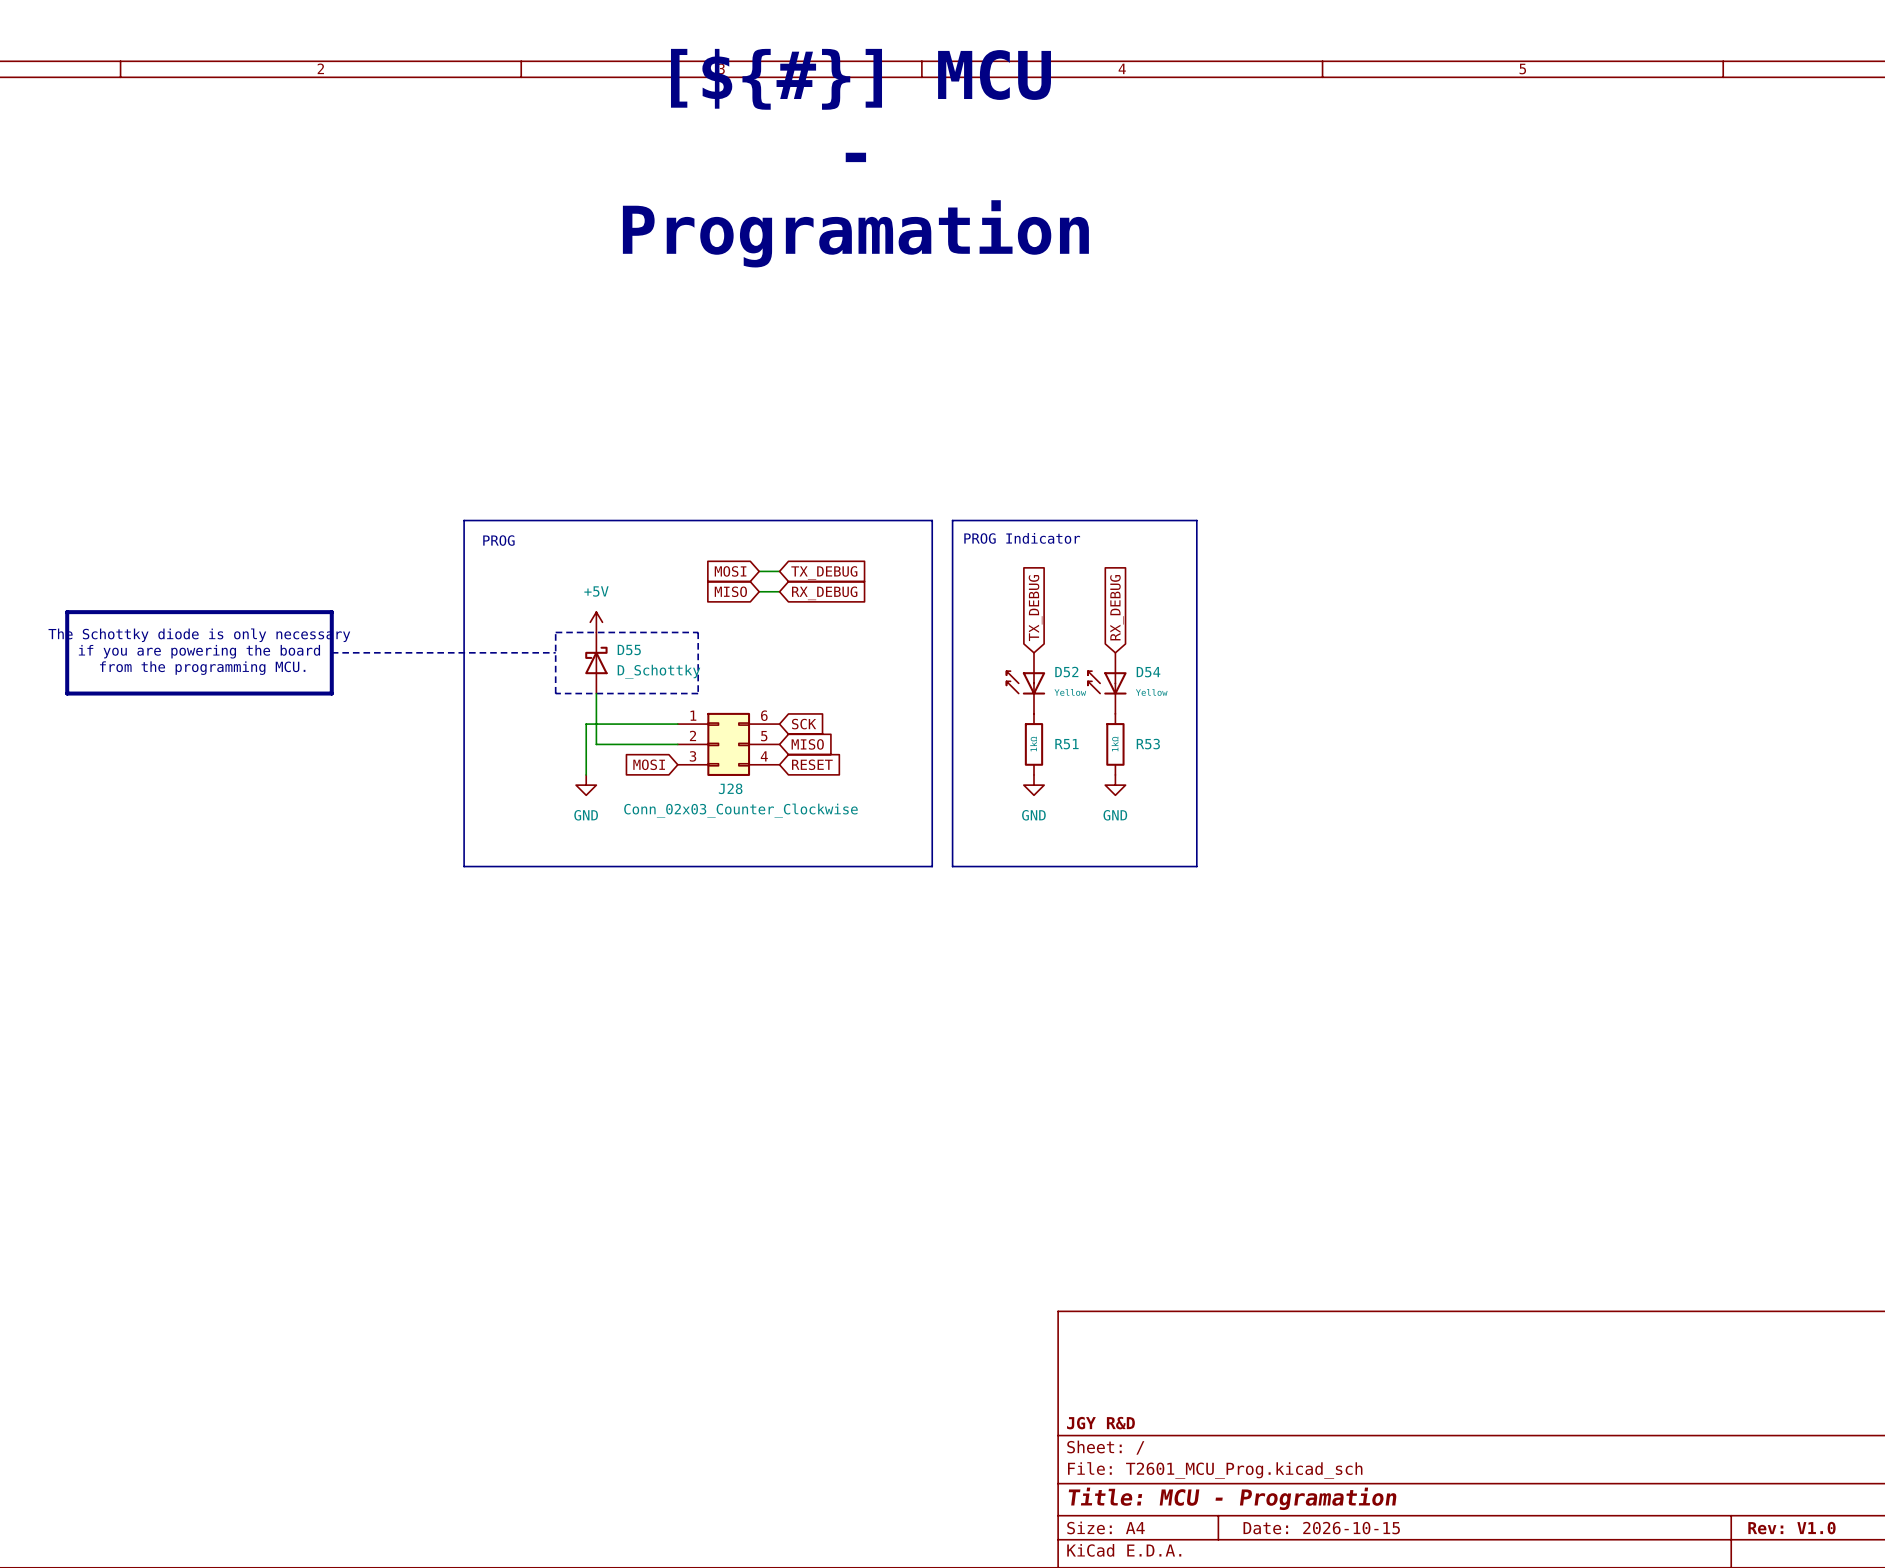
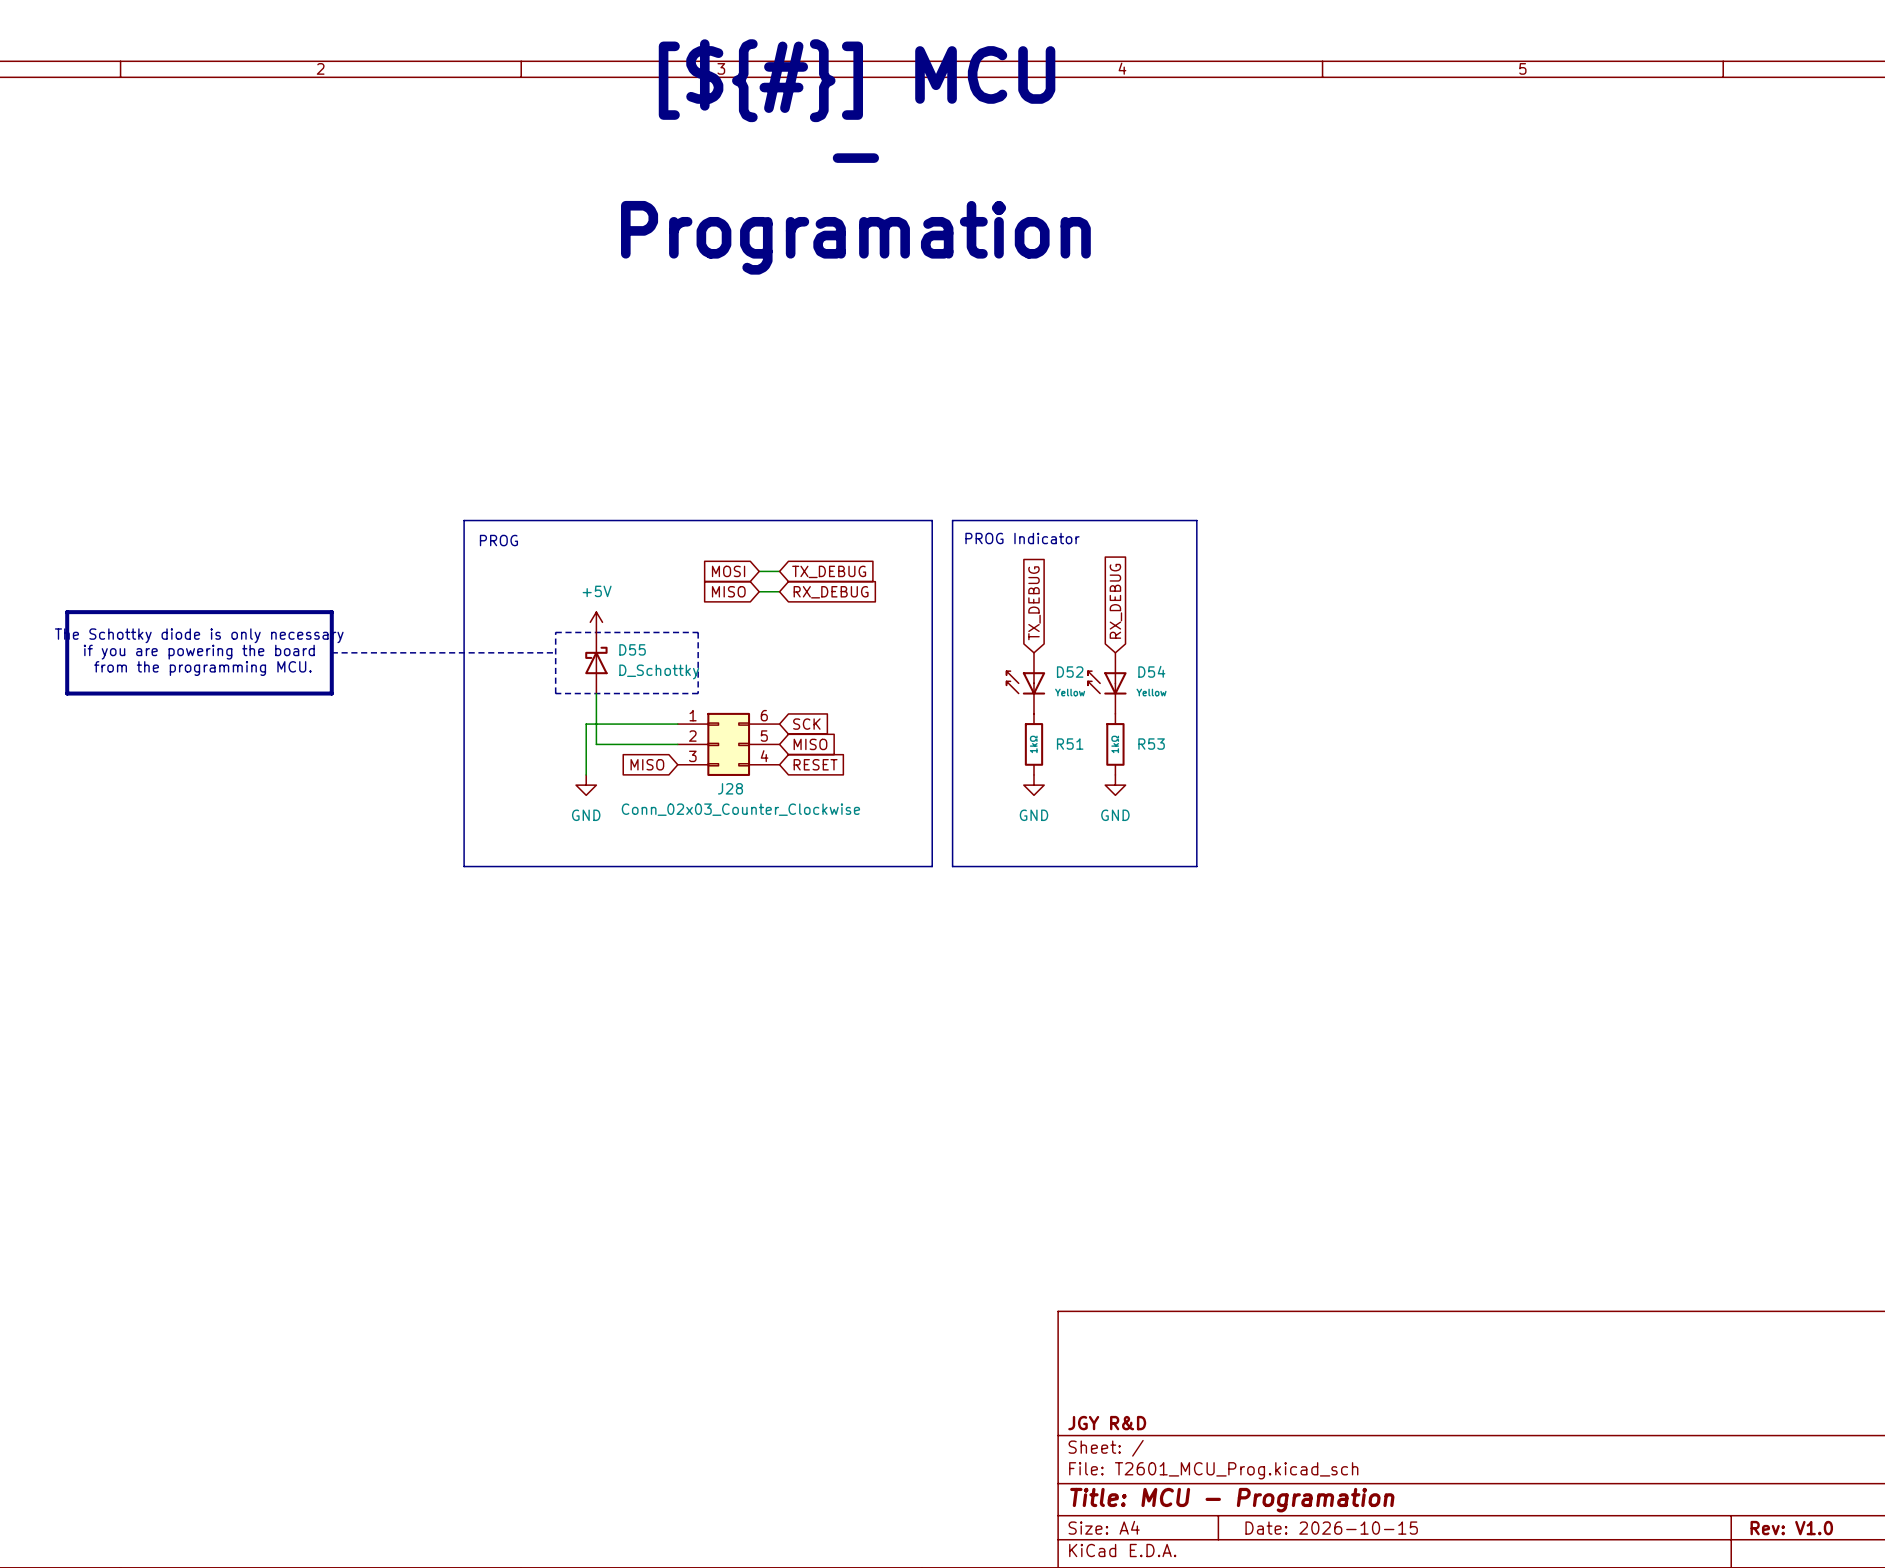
global label: MOSI (649, 764) -> MISO (647, 764)

